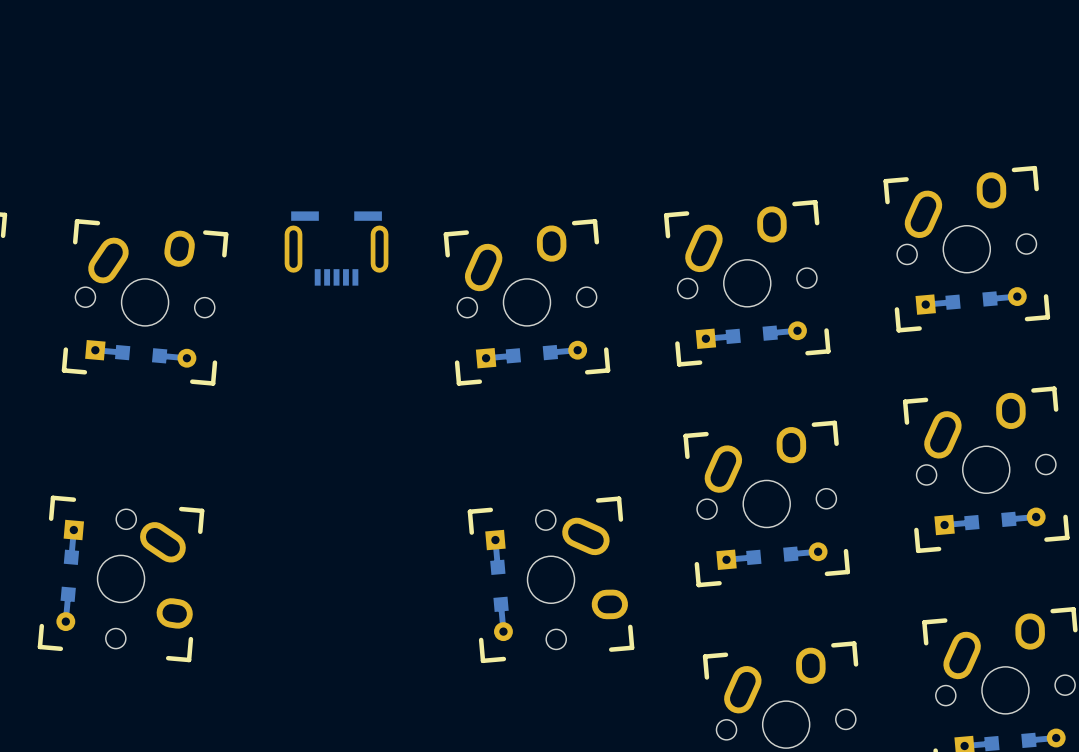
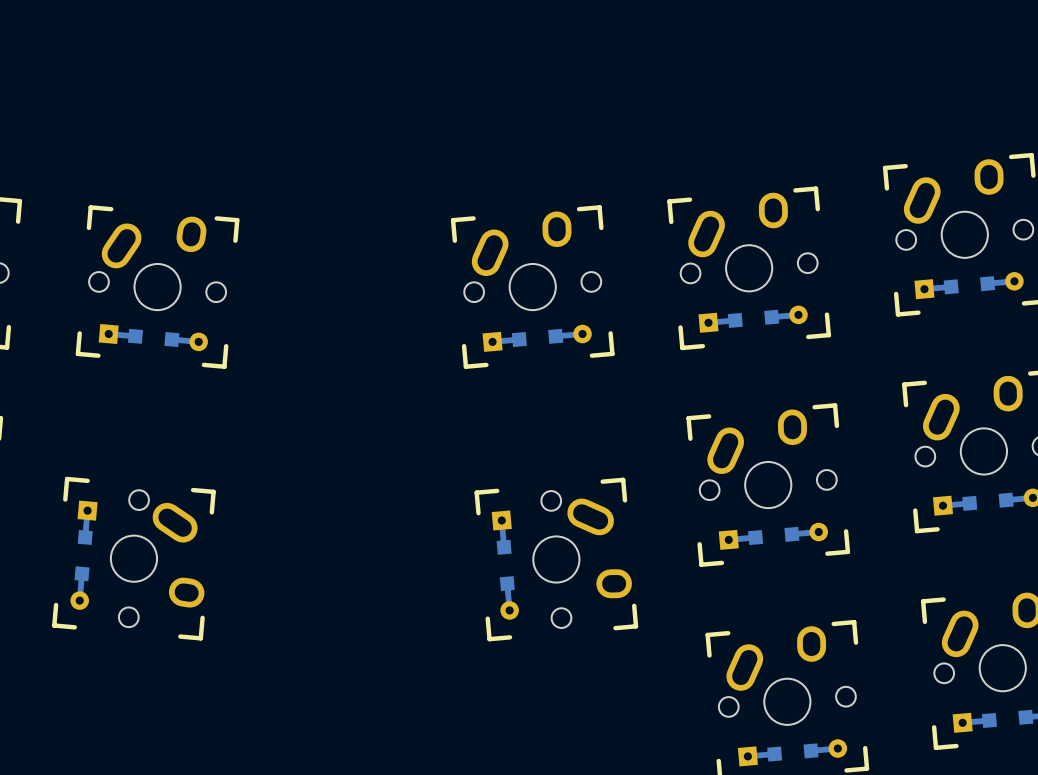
part: (336, 248) -> none

